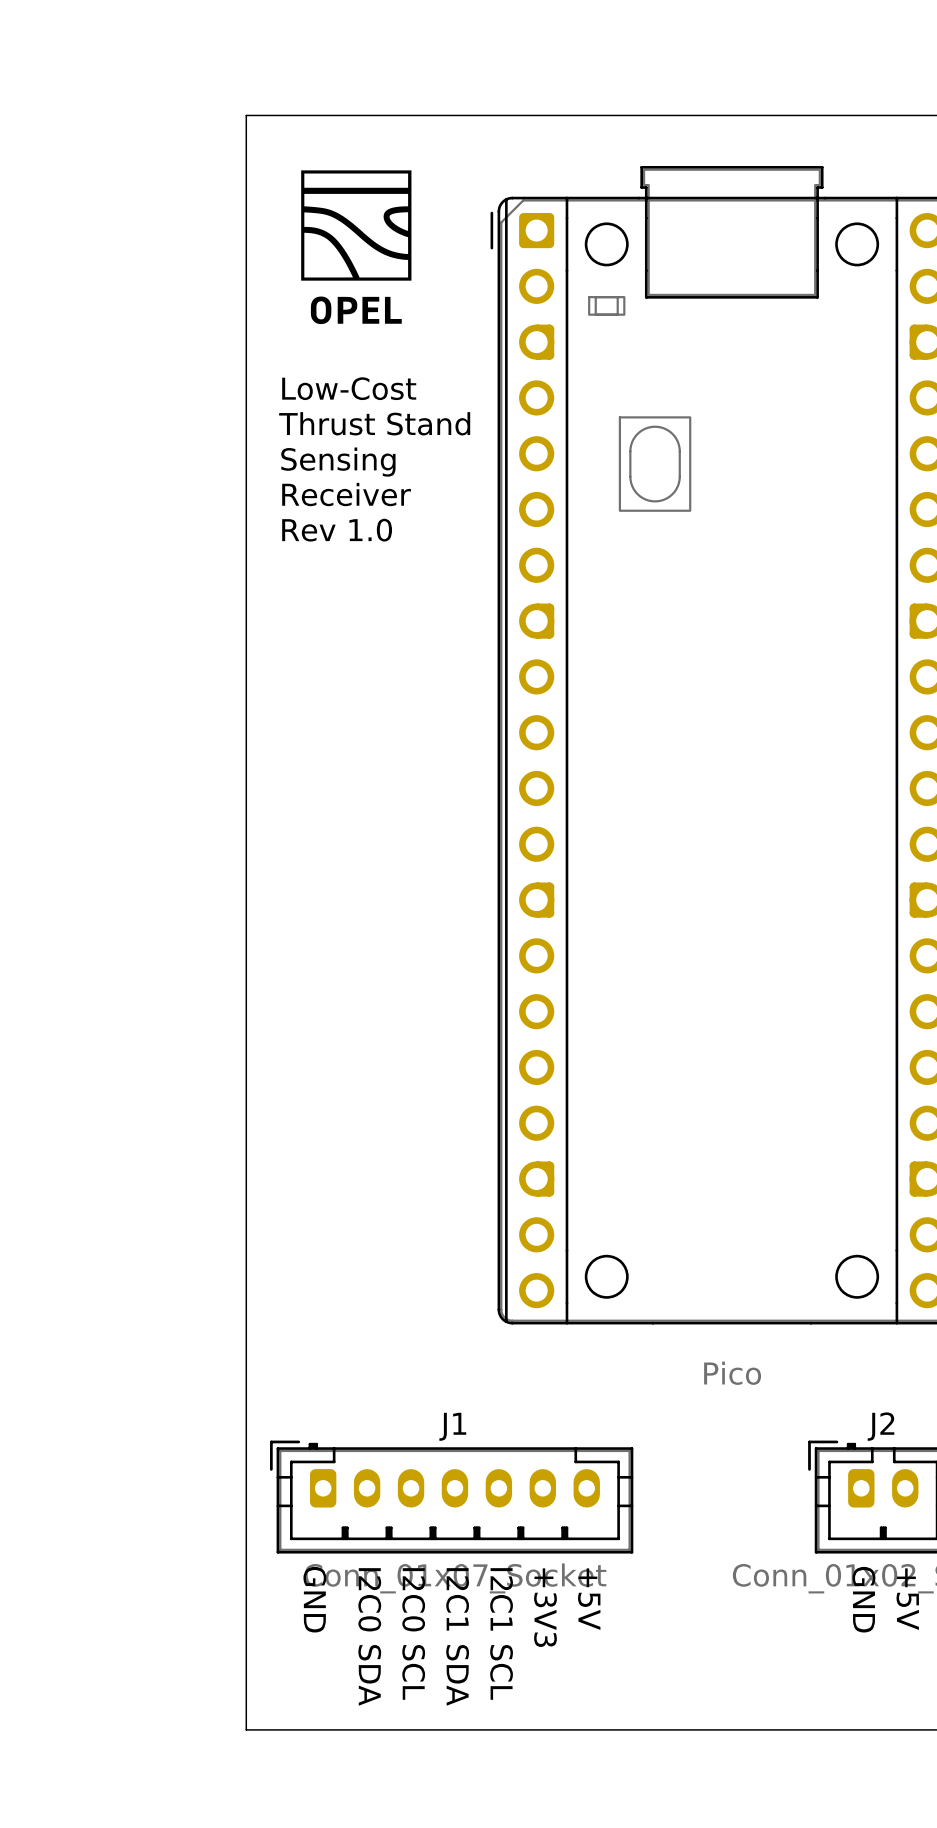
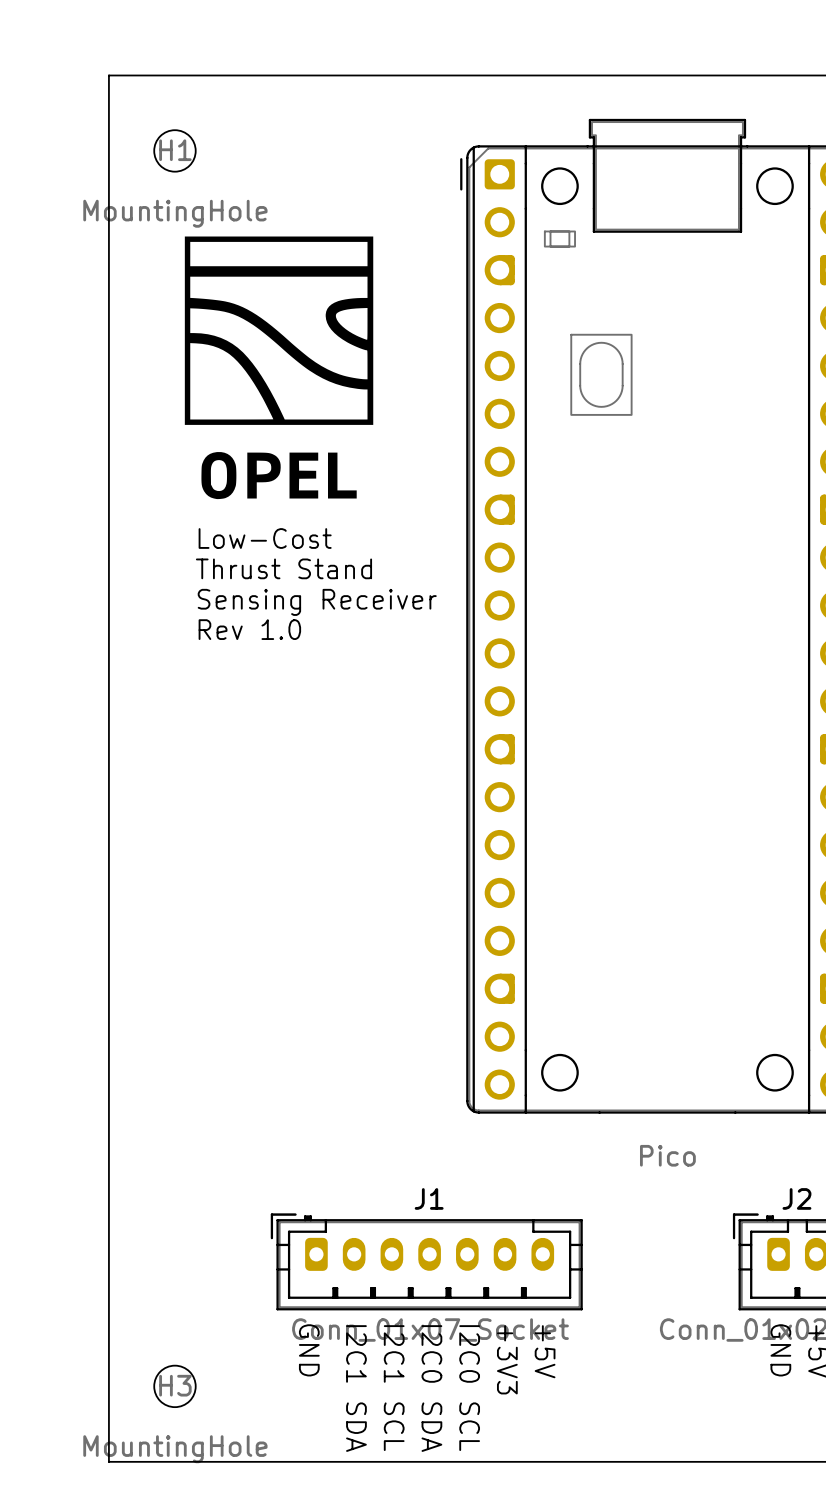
board edge: (246, 115) (246, 1729) -> (250, 75) (108, 75) (108, 1461) (250, 1461)
drawing: [301, 170, 412, 325] -> none
H1: none -> MountingHole (174, 150)
drawing: none -> [184, 236, 374, 500]
text position: Low-Cost (349, 388) -> Low-Cost (265, 538)
text position: Thrust Stand (374, 423) -> Thrust Stand (283, 568)
text: Sensing (338, 462) -> none
text: Receiver (346, 494) -> none
text position: Rev 1.0 (337, 530) -> Rev 1.0 (249, 629)
text: none -> Sensing Receiver (317, 602)
text: I2C0 SCL (413, 1633) -> I2C1 SCL (394, 1388)
text: I2C1 SCL (501, 1633) -> I2C0 SCL (469, 1388)
text: I2C0 SDA (369, 1636) -> I2C1 SDA (356, 1388)
text: I2C1 SDA (457, 1636) -> I2C0 SDA (431, 1388)
H3: none -> MountingHole (174, 1386)

